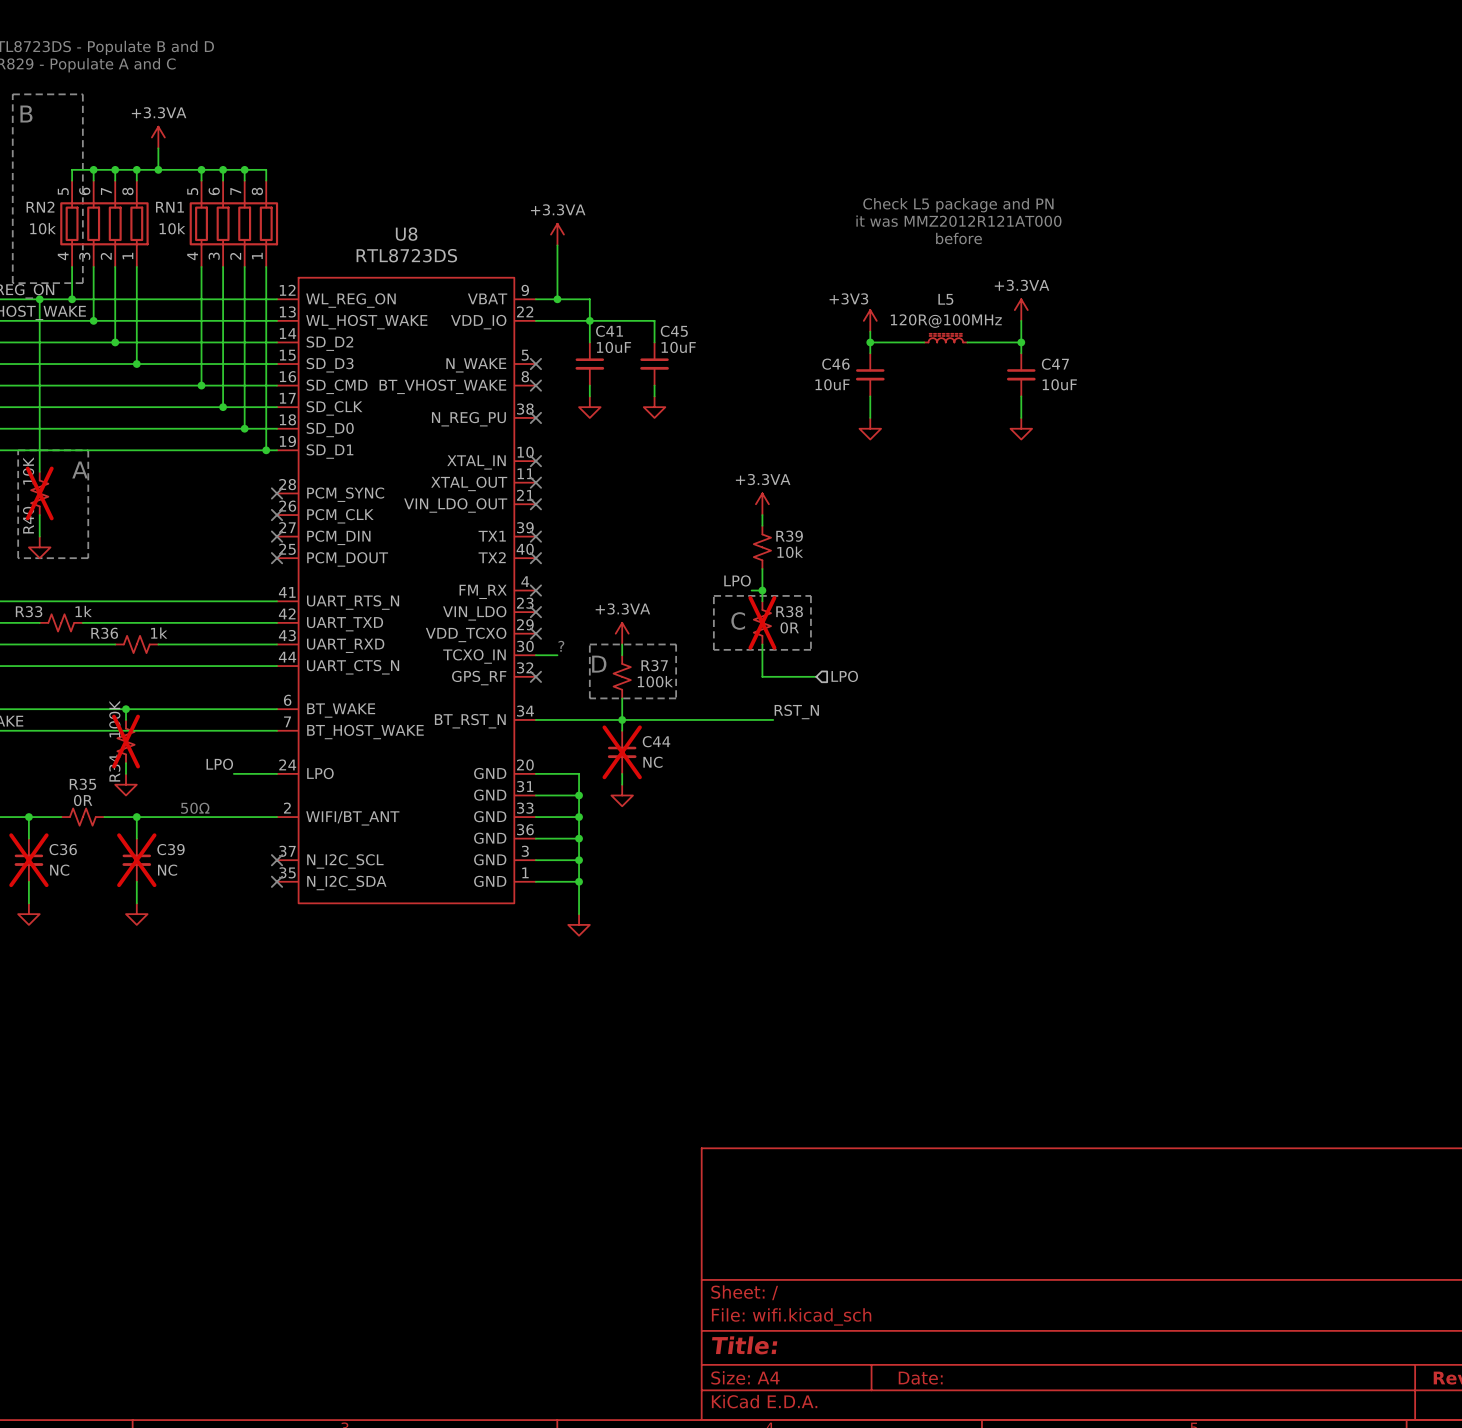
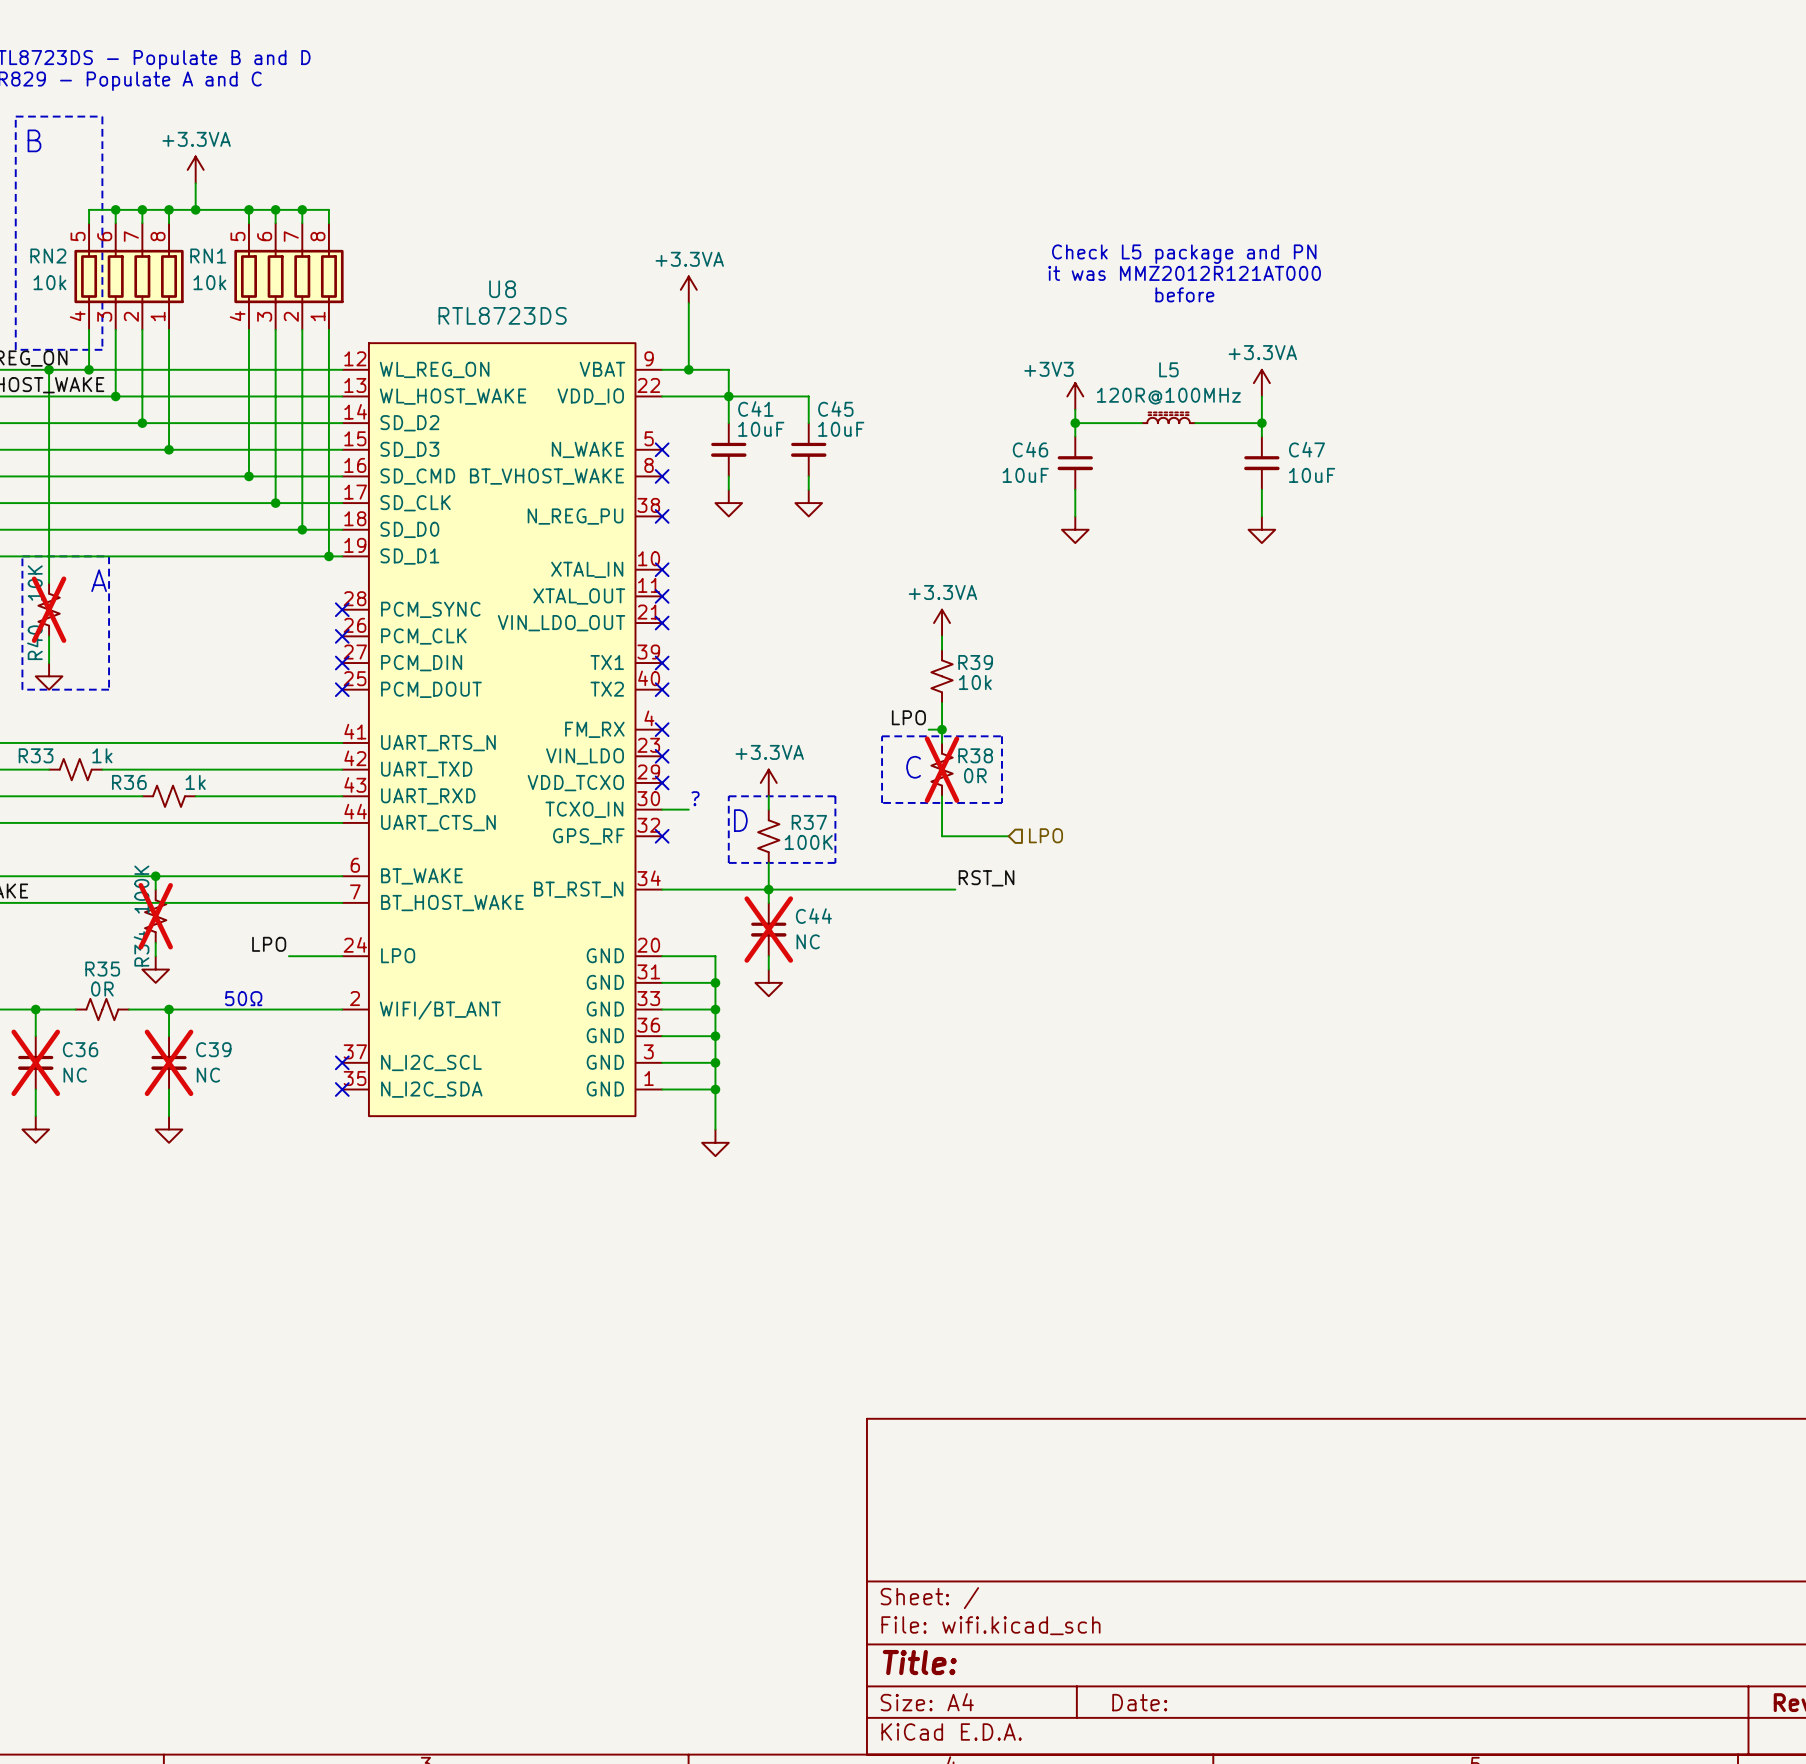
R37 value: 100k (655, 681) -> 100K (808, 842)

